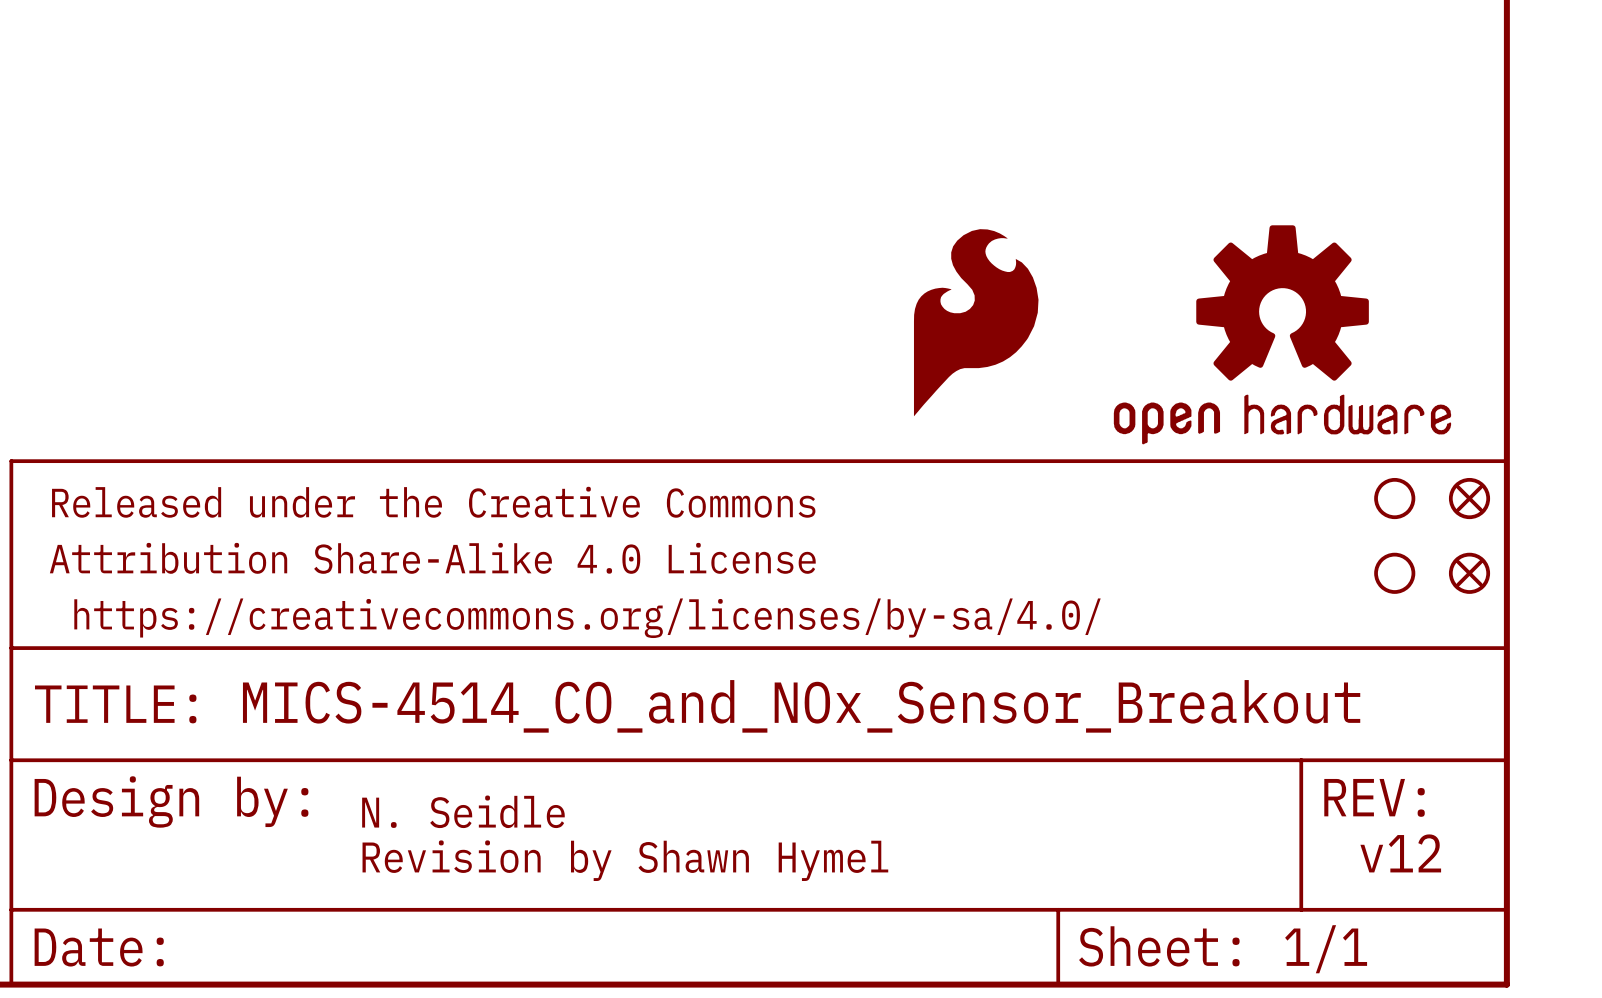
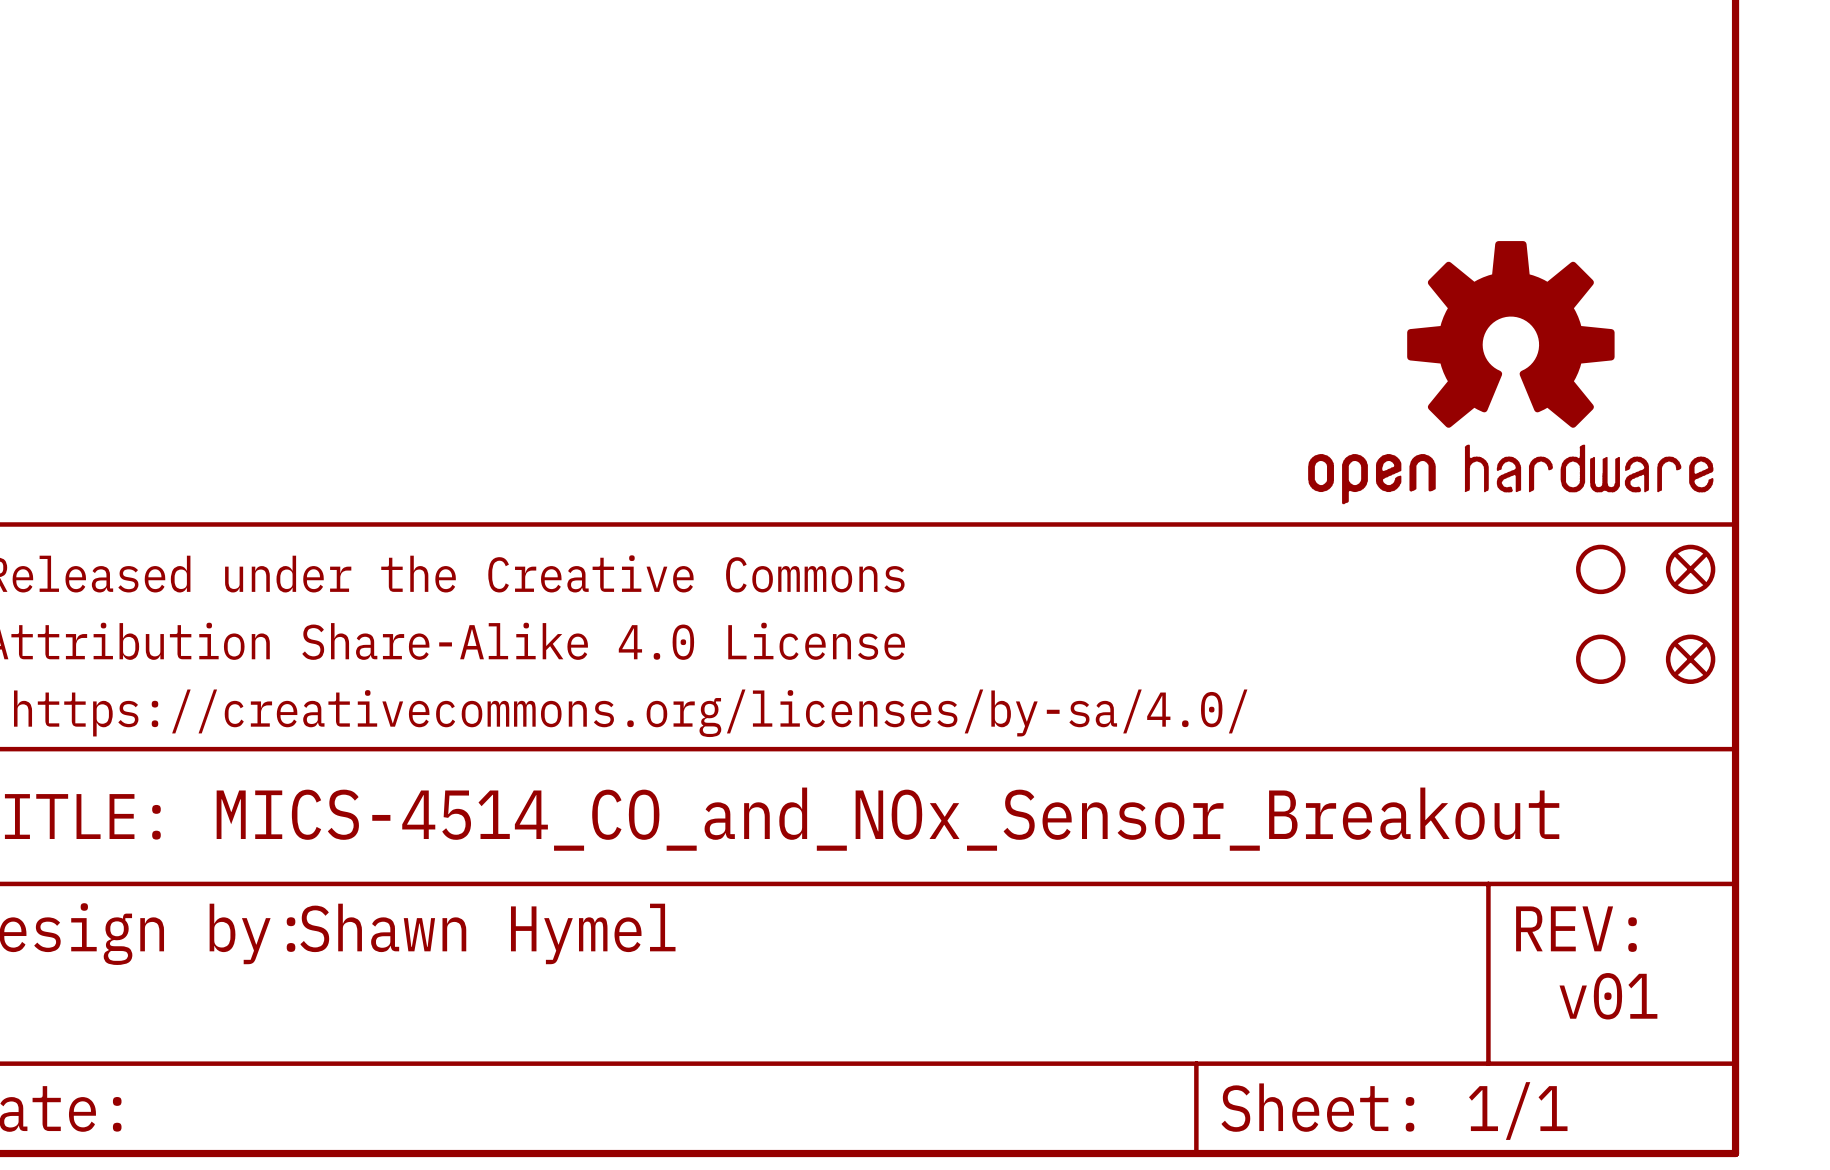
part: (976, 322) -> none
part position: (1282, 334) -> (1510, 372)
text: N. Seidle (463, 811) -> none
text: v12 (1400, 853) -> v01 (1608, 996)
text: Revision by Shawn Hymel (625, 860) -> Shawn Hymel (487, 933)

